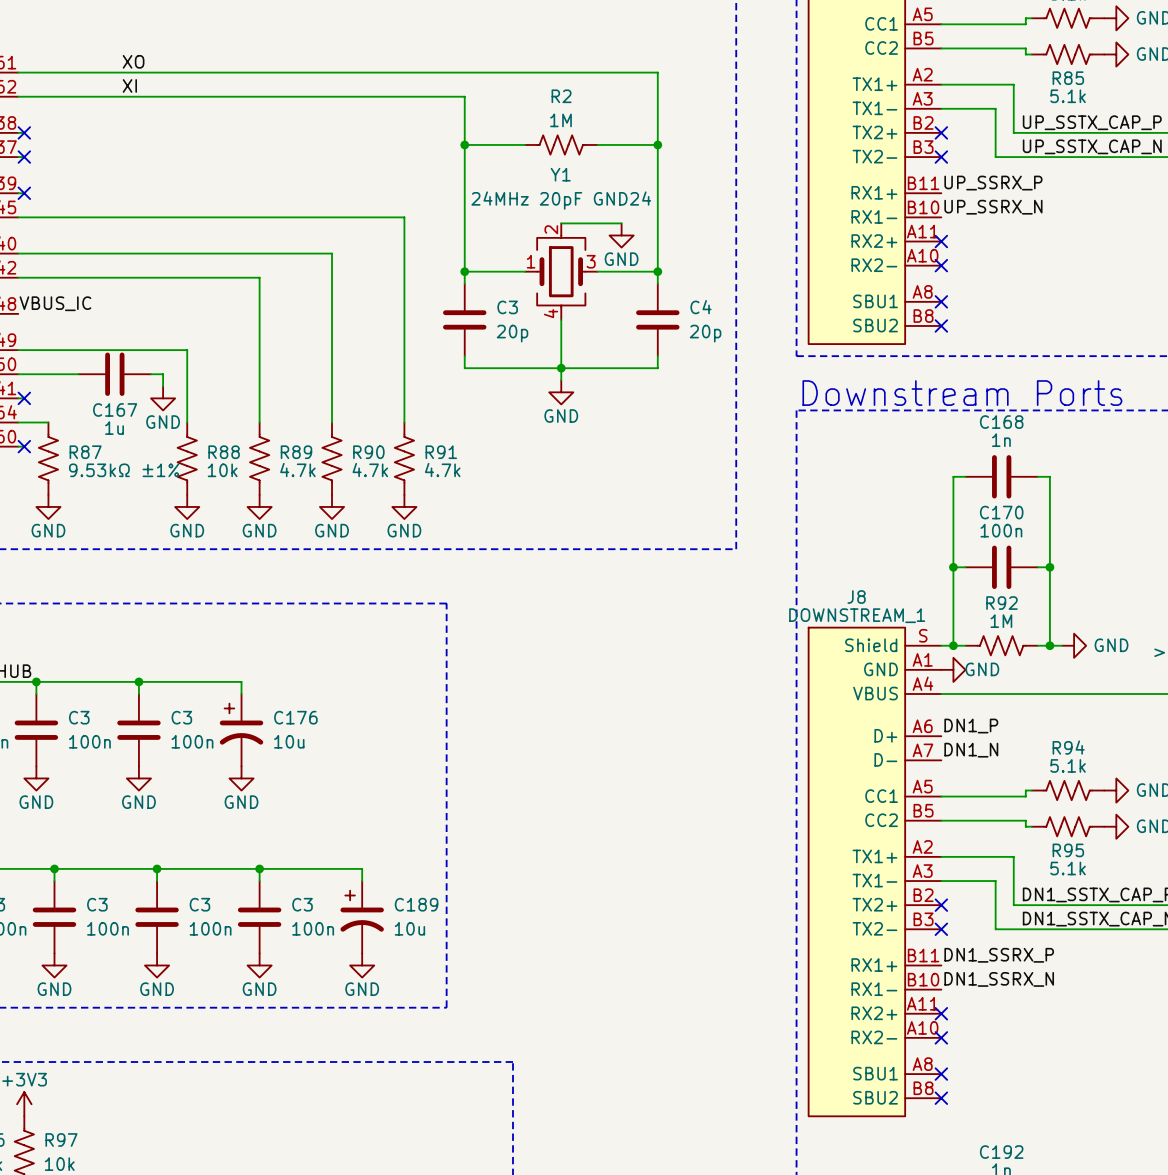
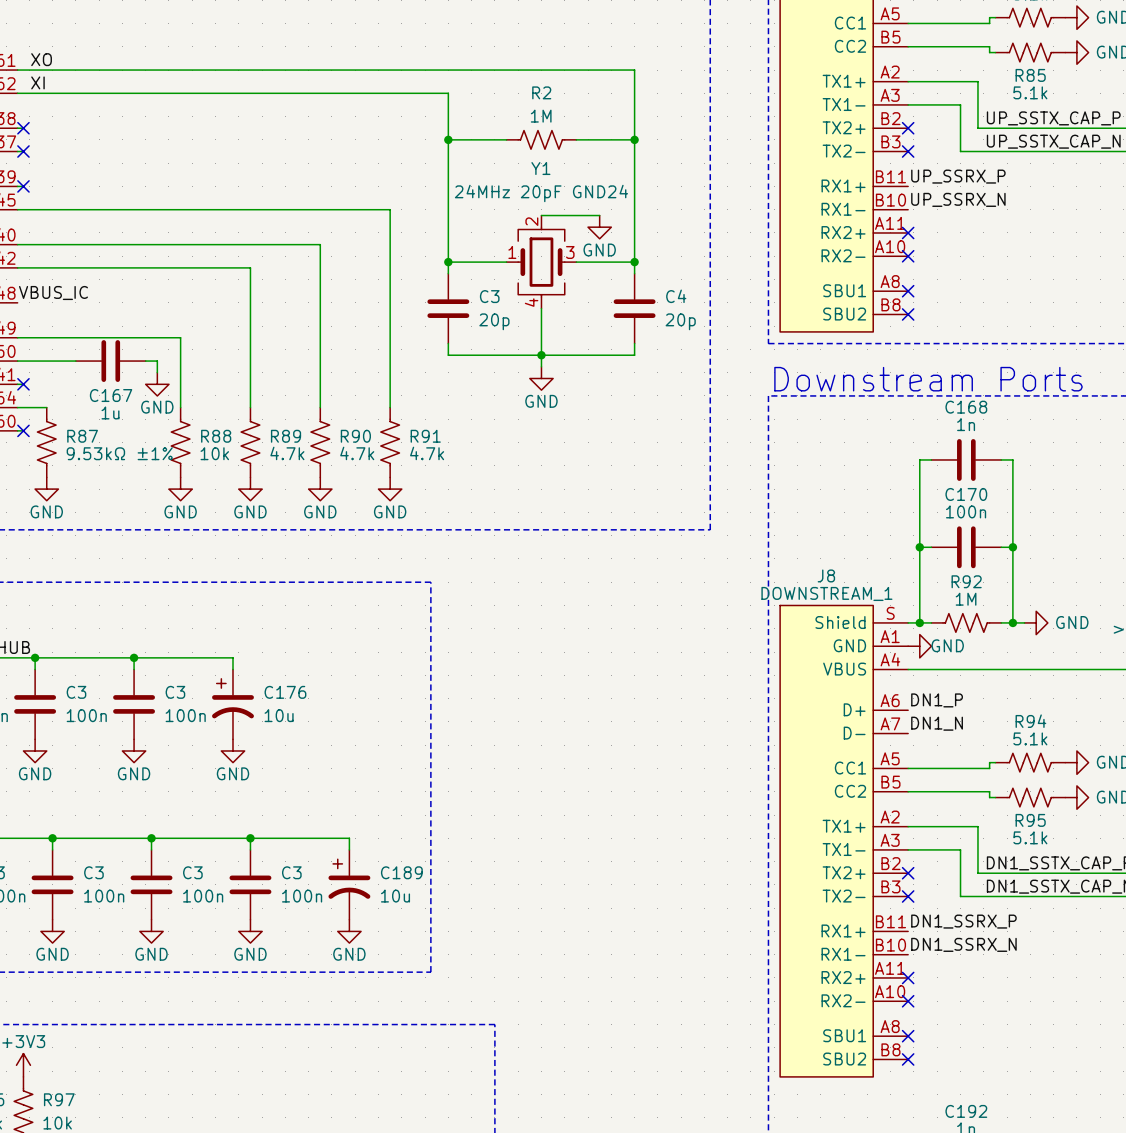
label position: XO (133, 61) -> XO (41, 59)
label position: XI (129, 85) -> XI (37, 82)

